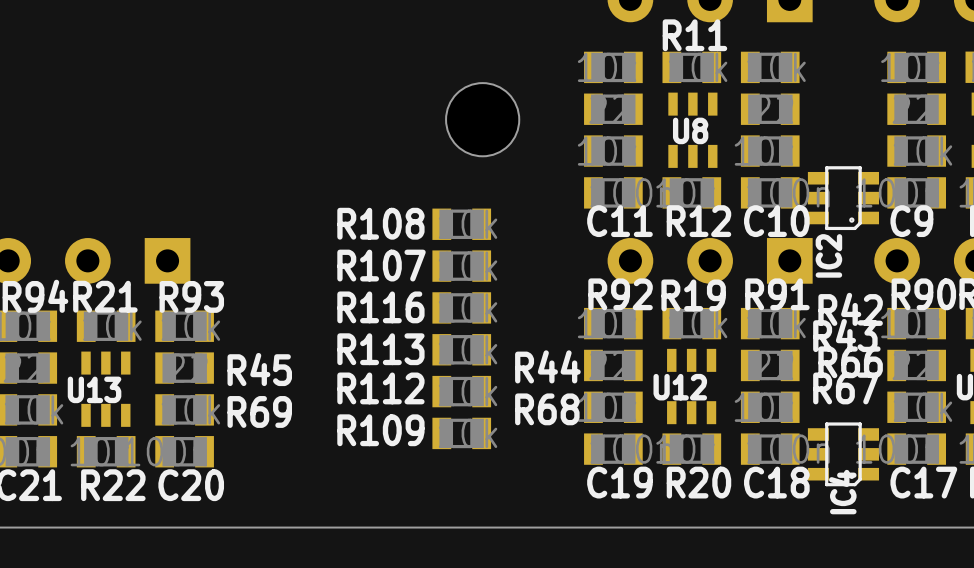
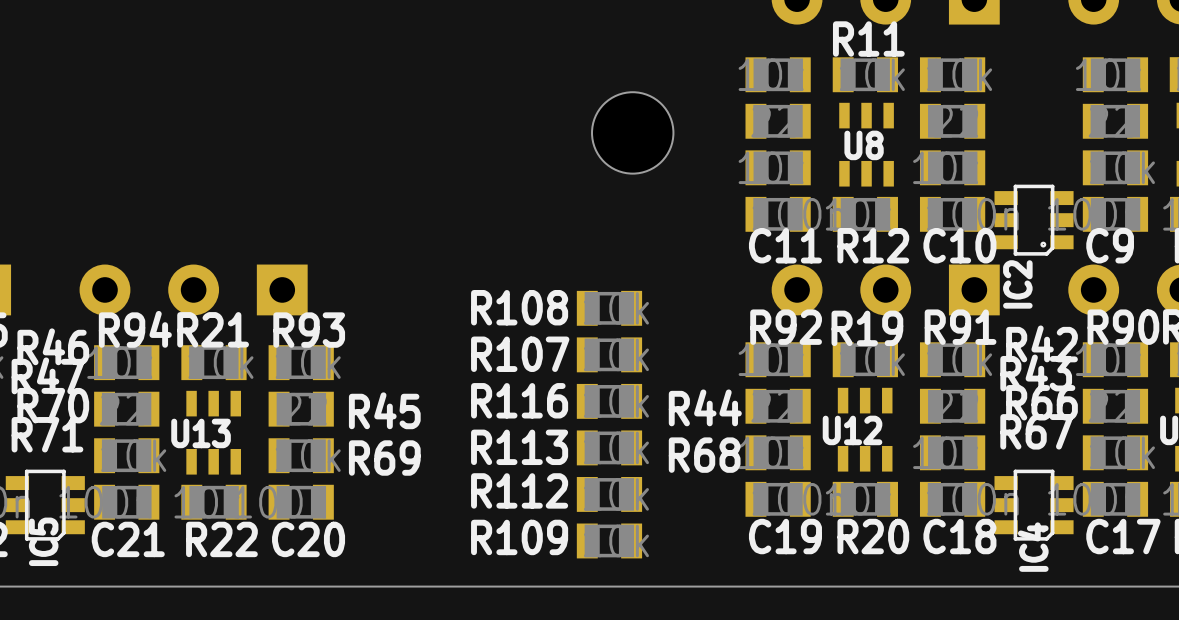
R108 position: (461, 224) -> (609, 308)
R107 position: (461, 266) -> (609, 354)
R116 position: (461, 307) -> (609, 401)
R113 position: (461, 349) -> (609, 447)
R112 position: (461, 391) -> (609, 494)
R109 position: (461, 433) -> (609, 540)

